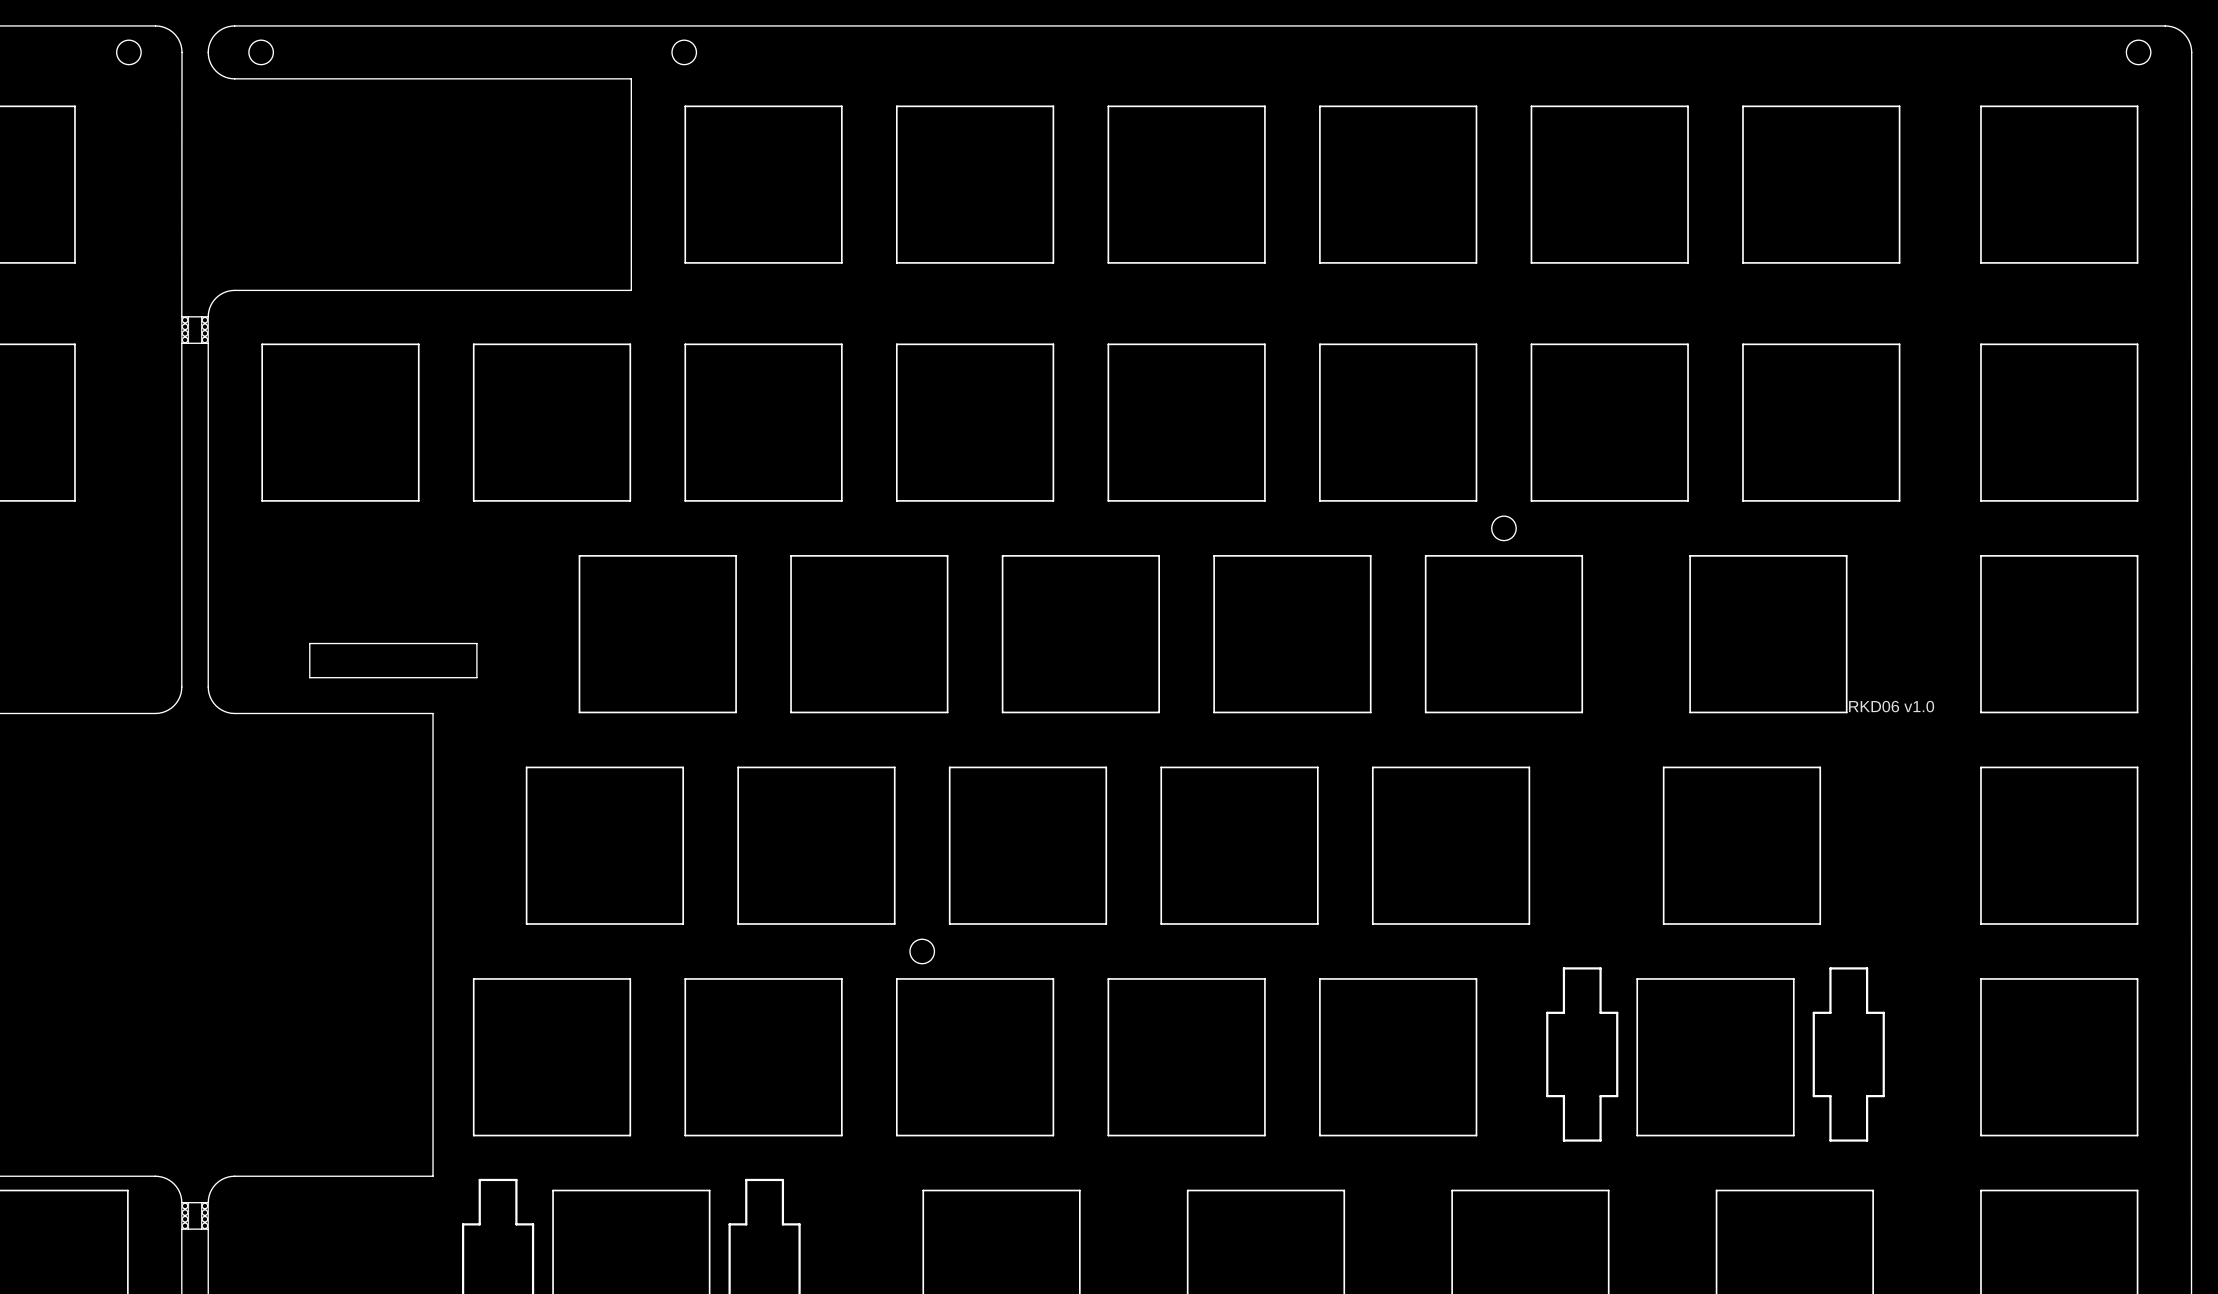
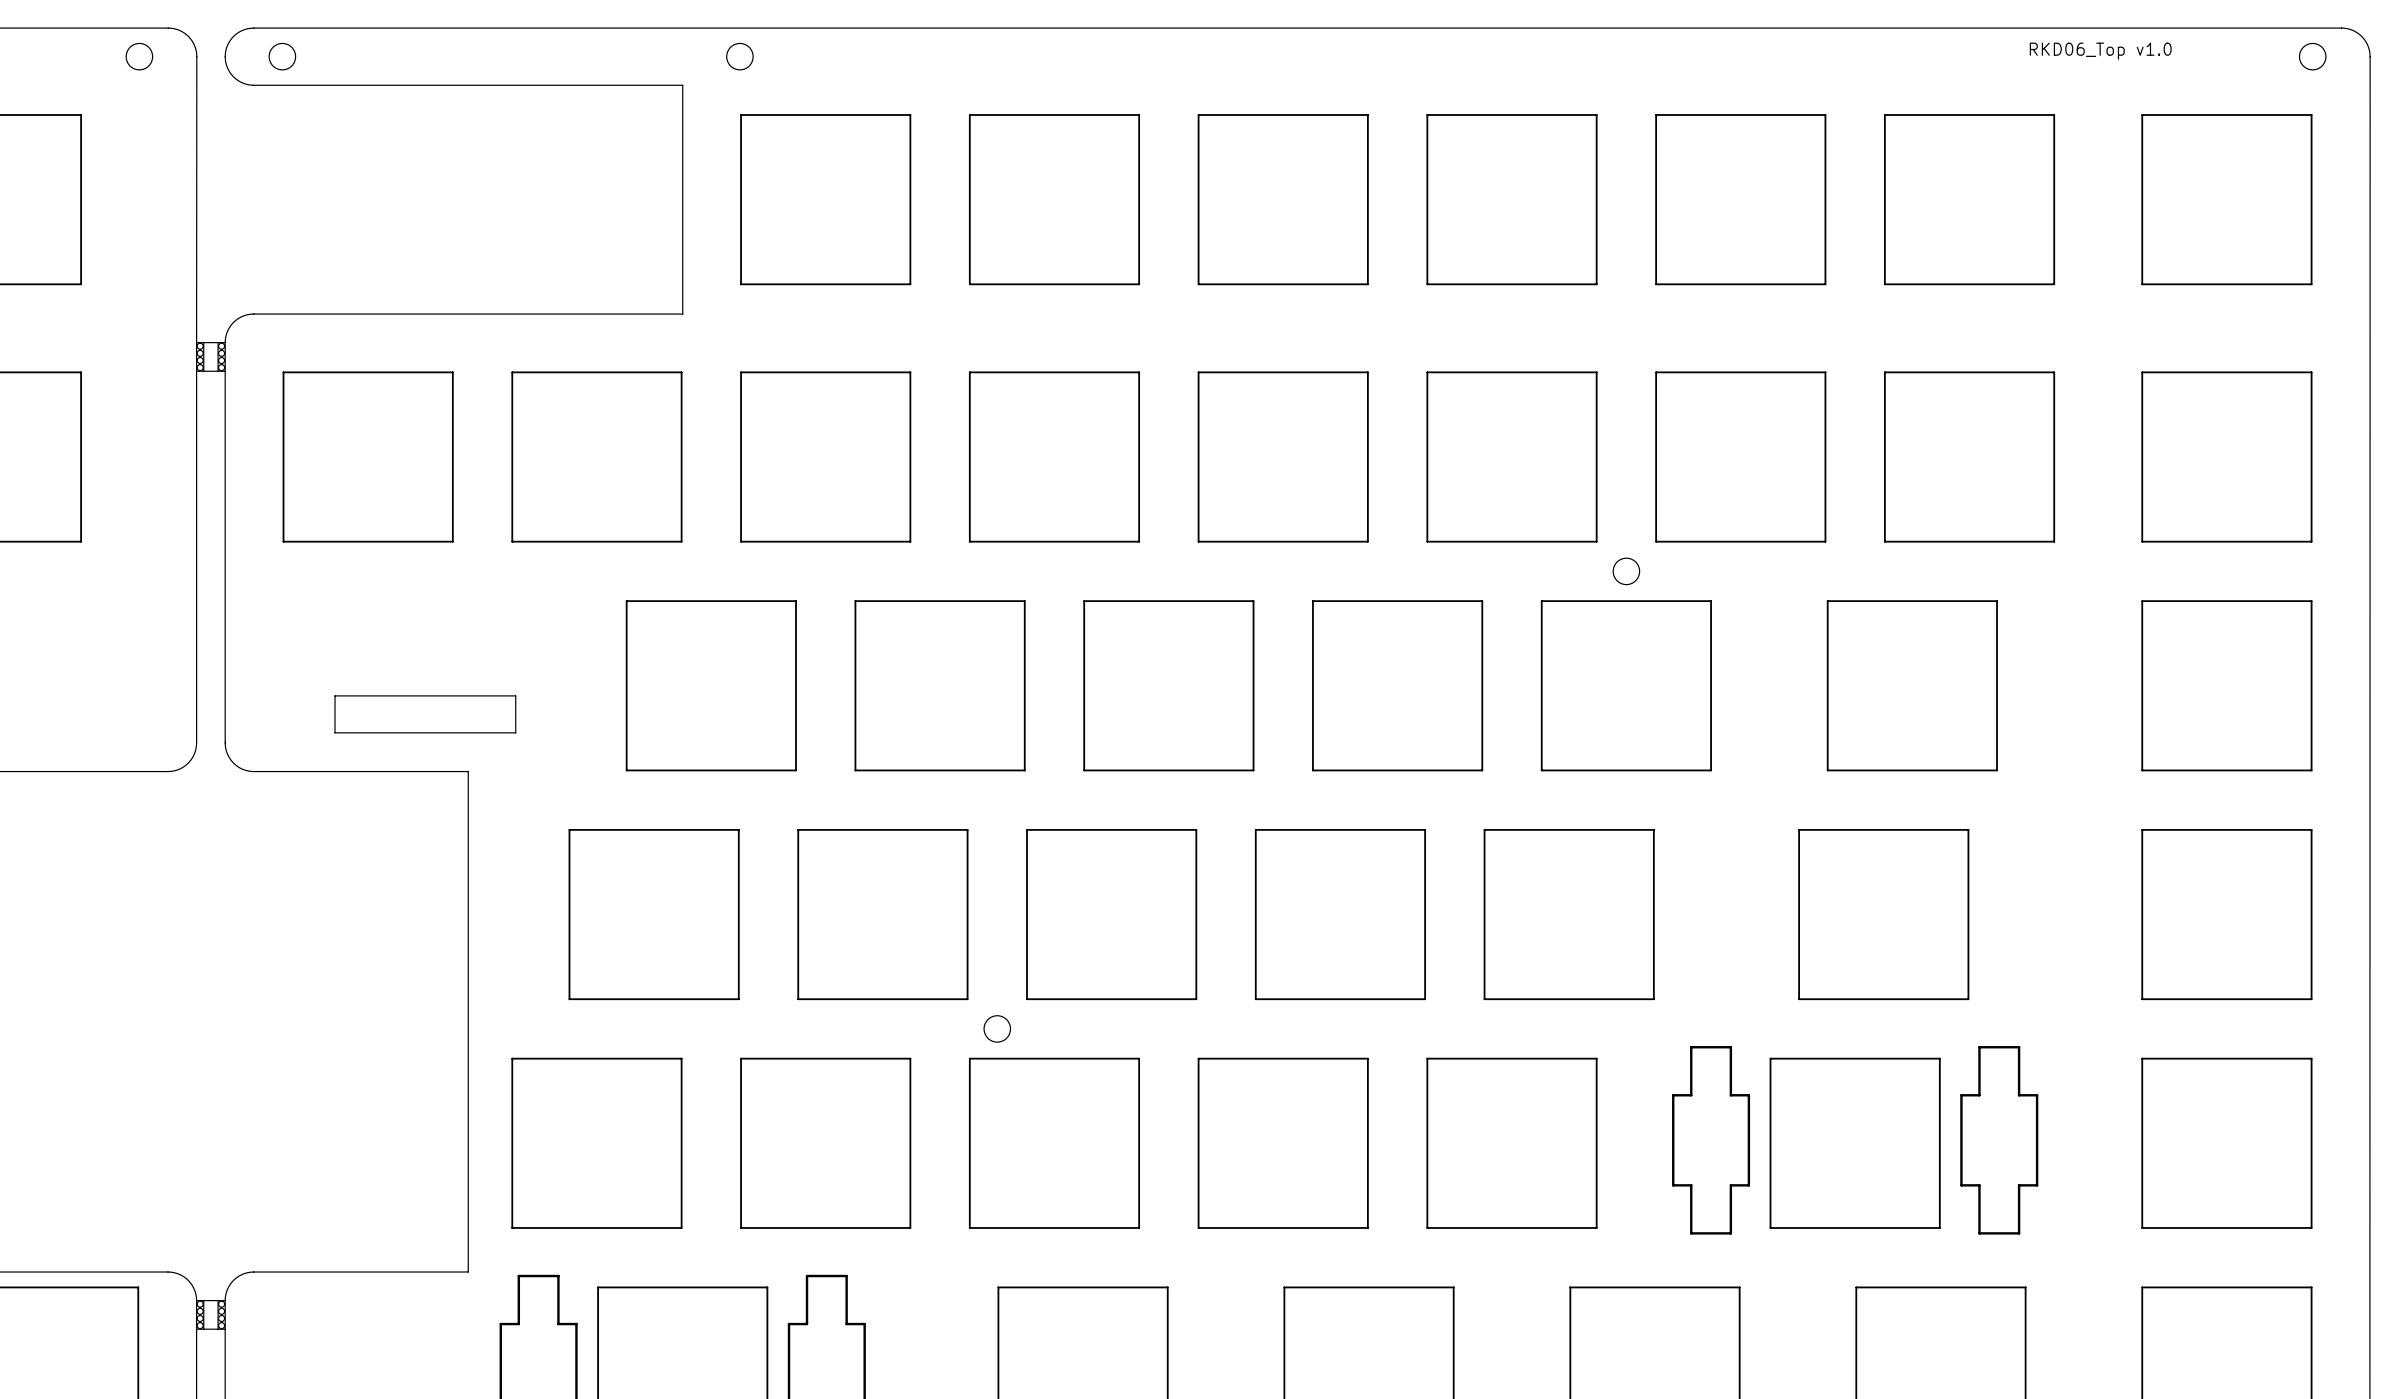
text: none -> RKD06_Top v1.0 (2100, 51)
text: RKD06 v1.0 (1891, 706) -> none

